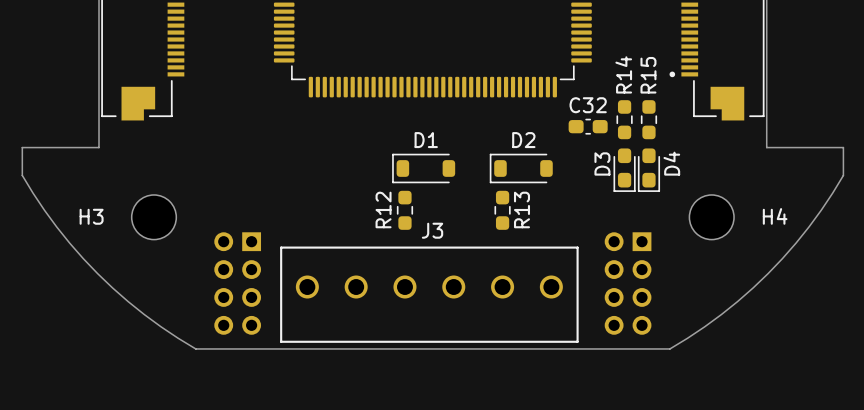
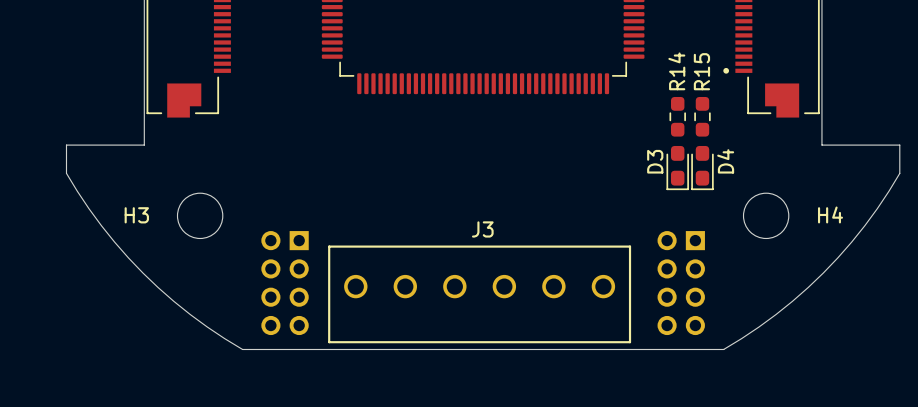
C32: (588, 126) -> none
D1: (423, 168) -> none
D2: (521, 168) -> none
R12: (404, 210) -> none
R13: (502, 210) -> none

